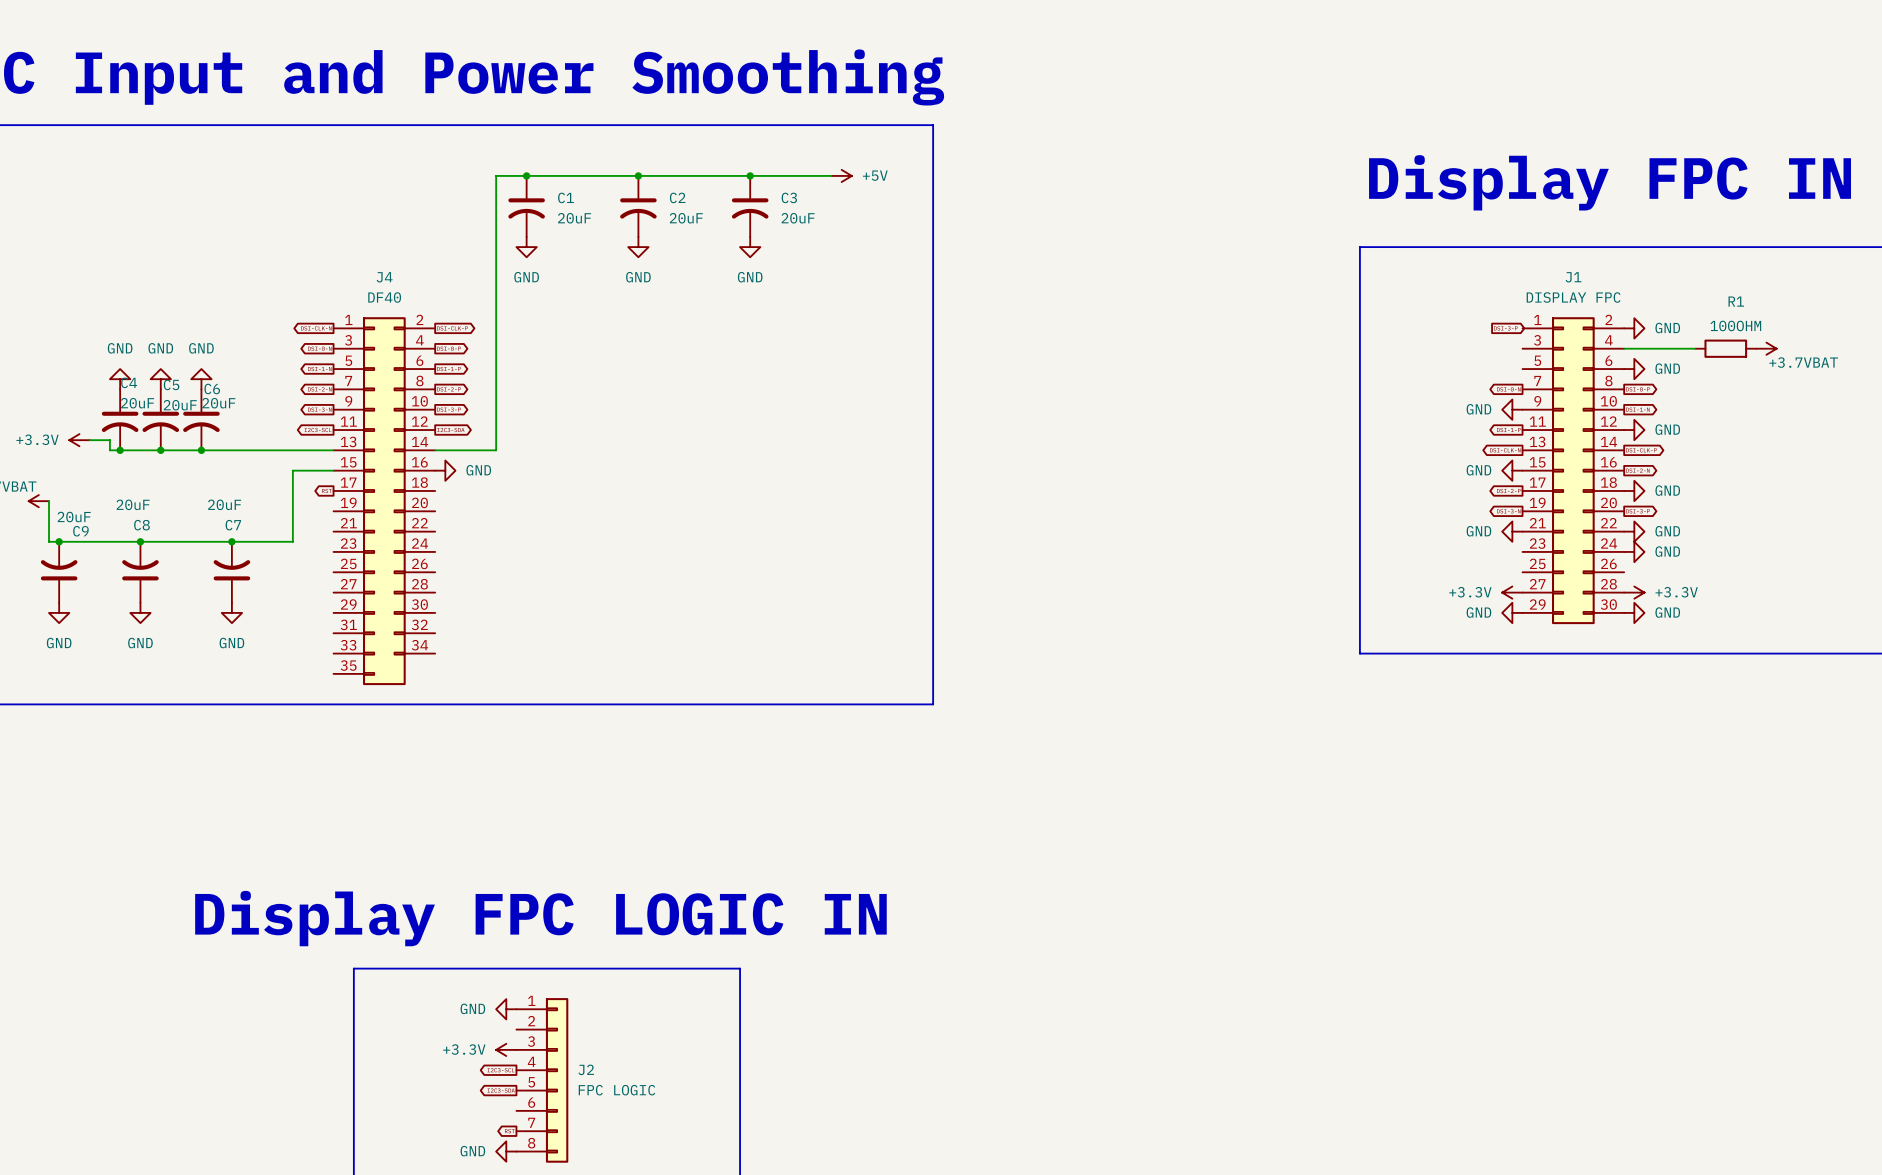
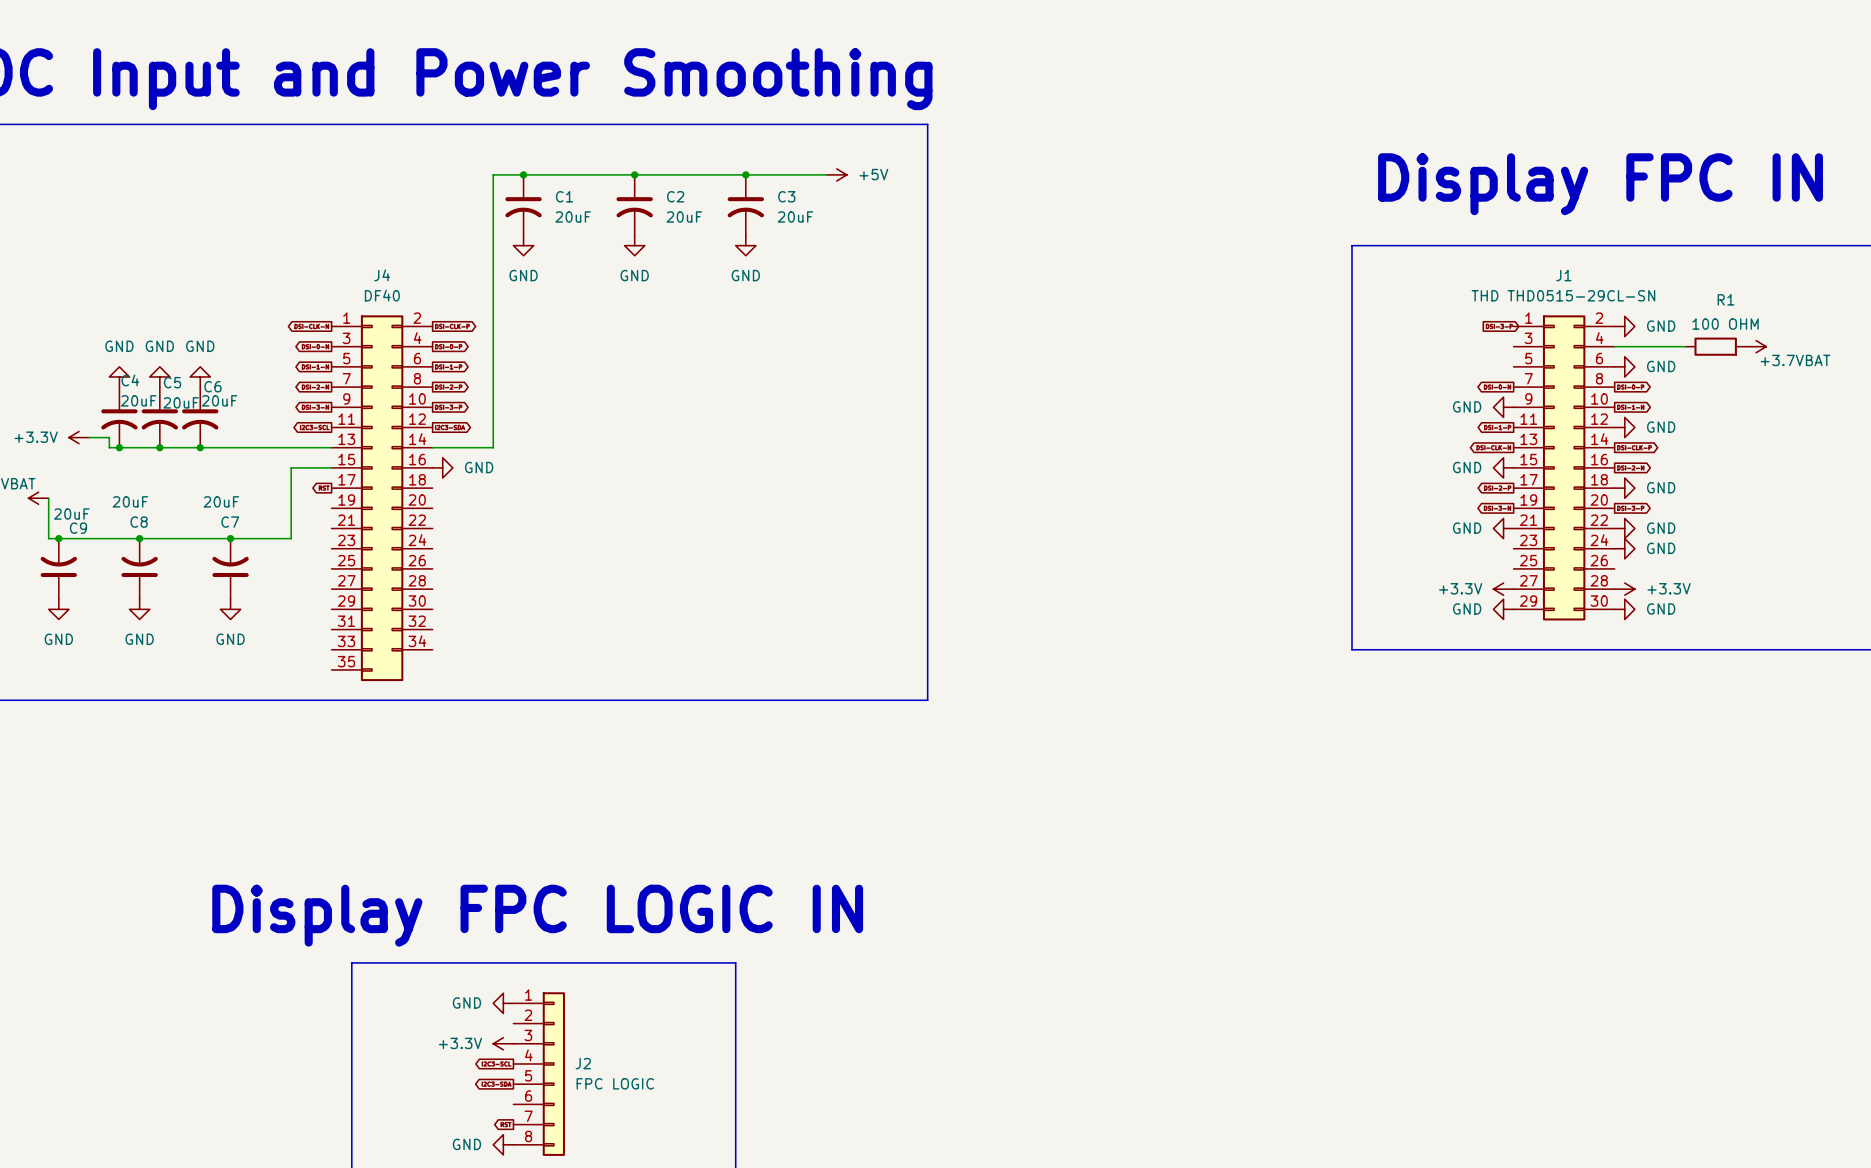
J1 value: DISPLAY FPC (1573, 297) -> THD THD0515-29CL-SN (1563, 295)
R1 value: 100OHM (1735, 325) -> 100 OHM (1725, 324)

